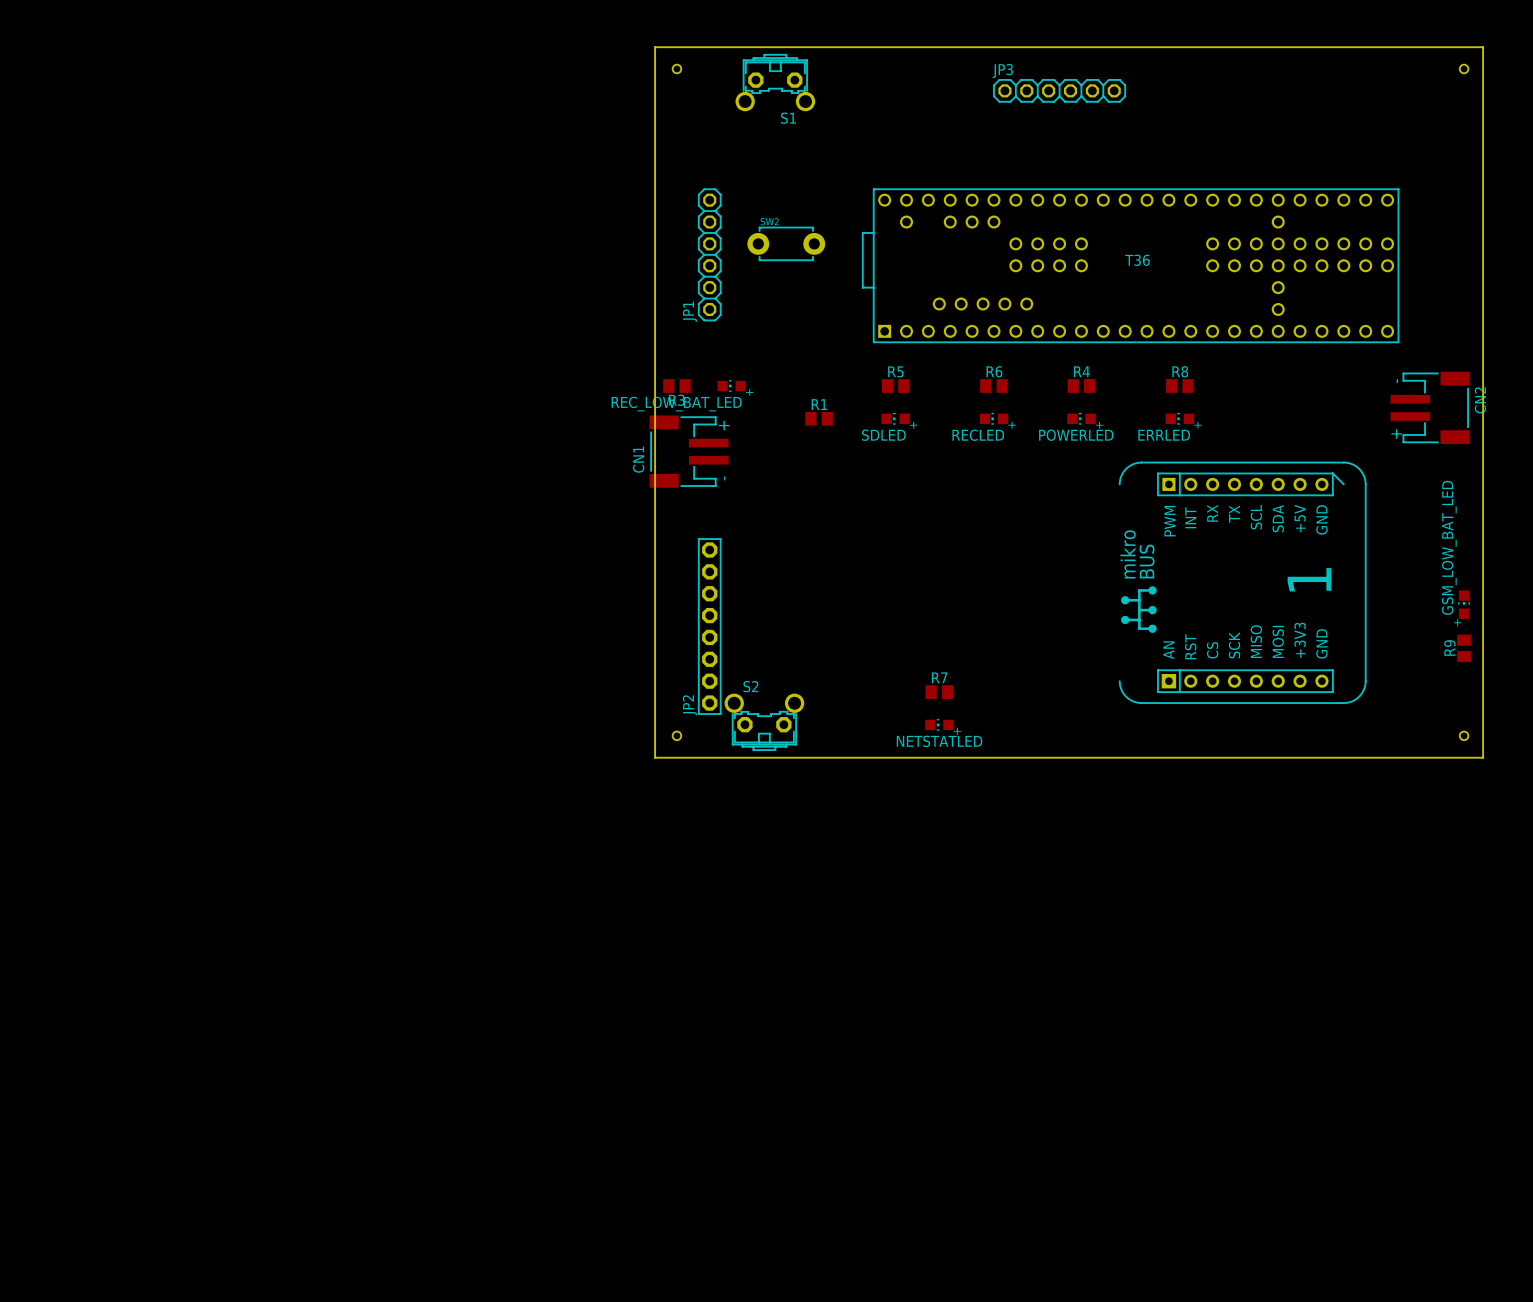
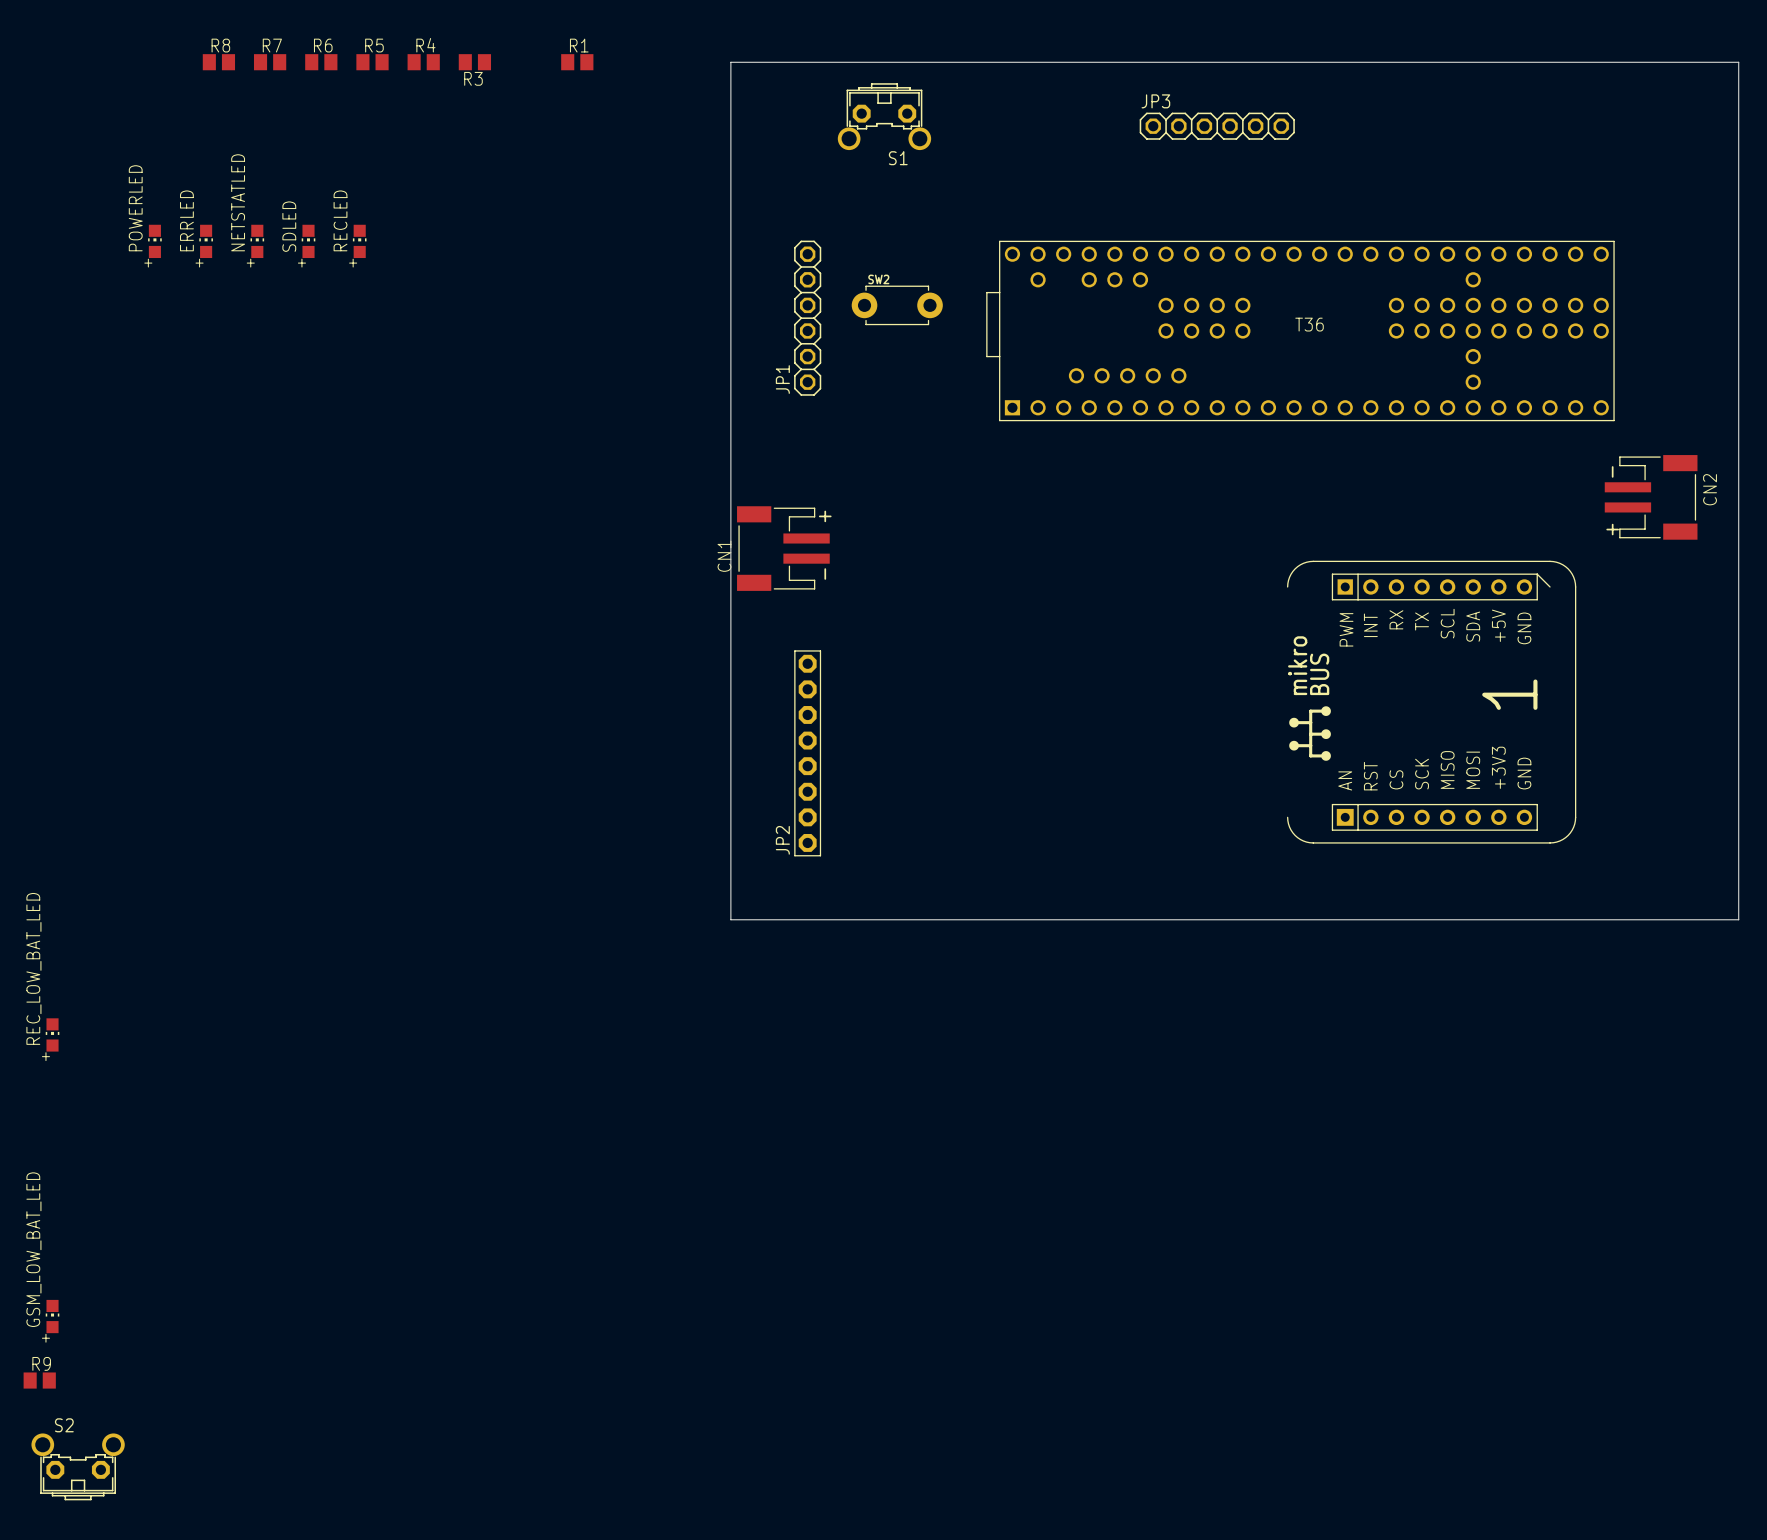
board edge: (655, 47) (1483, 47) (1483, 757) (655, 757) (655, 47) -> (730, 62) (730, 919) (1738, 919) (1738, 62) (730, 62)
hole: (676, 68) -> none
hole: (1464, 68) -> none
POWERLED: none -> (154, 241)
ERRLED: none -> (206, 241)
NETSTATLED: none -> (257, 241)
SDLED: none -> (308, 241)
RECLED: none -> (359, 241)
R3 position: (676, 386) -> (474, 62)
REC_LOW_BAT_LED: (731, 386) -> none
R5 position: (895, 386) -> (372, 62)
R6 position: (993, 386) -> (321, 62)
R4 position: (1081, 386) -> (423, 62)
R8 position: (1179, 386) -> (218, 62)
R1 position: (819, 418) -> (577, 62)
SDLED: (895, 418) -> none
RECLED: (993, 418) -> none
POWERLED: (1081, 418) -> none
ERRLED: (1179, 418) -> none
GSM_LOW_BAT_LED: (1464, 604) -> none
R9 rotation: 0° (1464, 648) -> 90° clockwise (39, 1380)
R9 position: (1464, 648) -> (39, 1380)
R7 position: (939, 692) -> (270, 62)
S2 position: (764, 722) -> (78, 1466)
NETSTATLED: (939, 724) -> none
hole: (676, 735) -> none
hole: (1464, 735) -> none
REC_LOW_BAT_LED: none -> (52, 1034)
GSM_LOW_BAT_LED: none -> (52, 1316)

